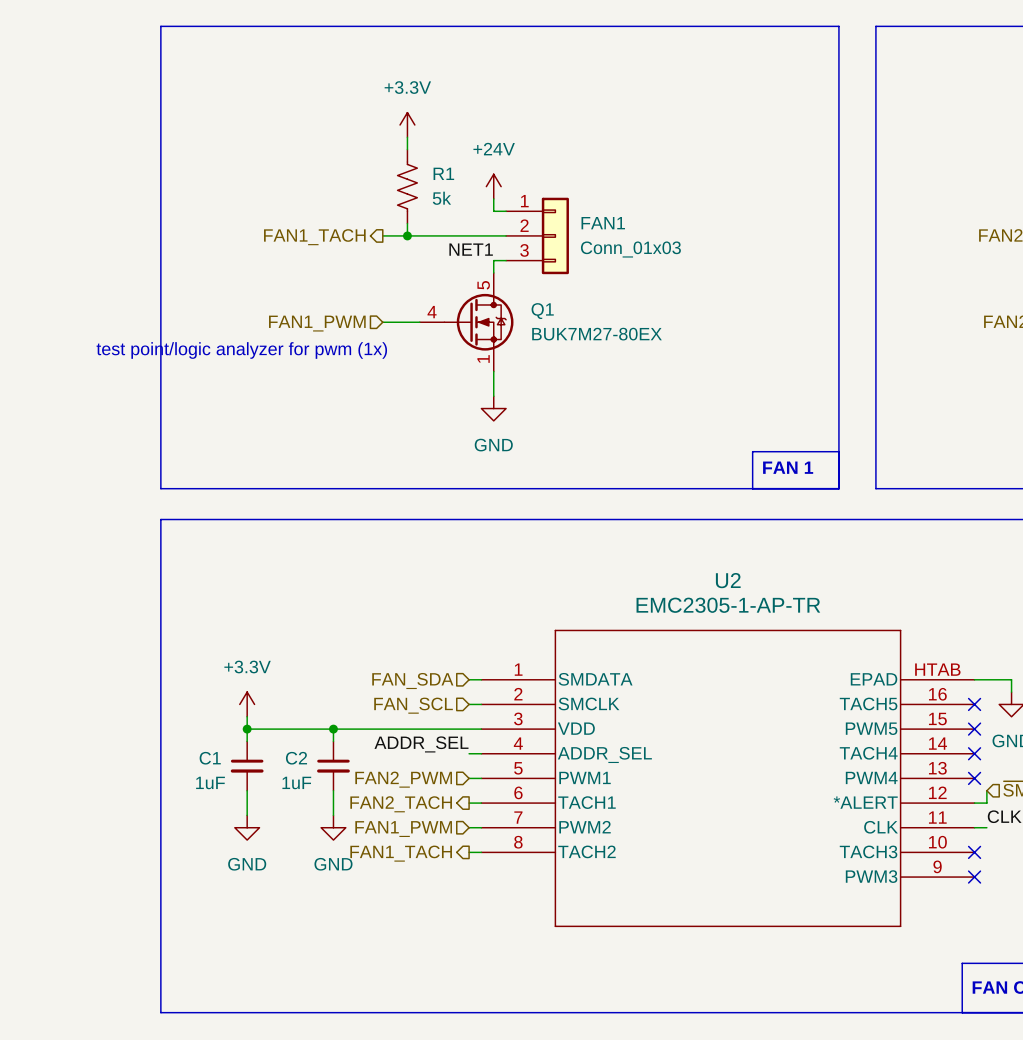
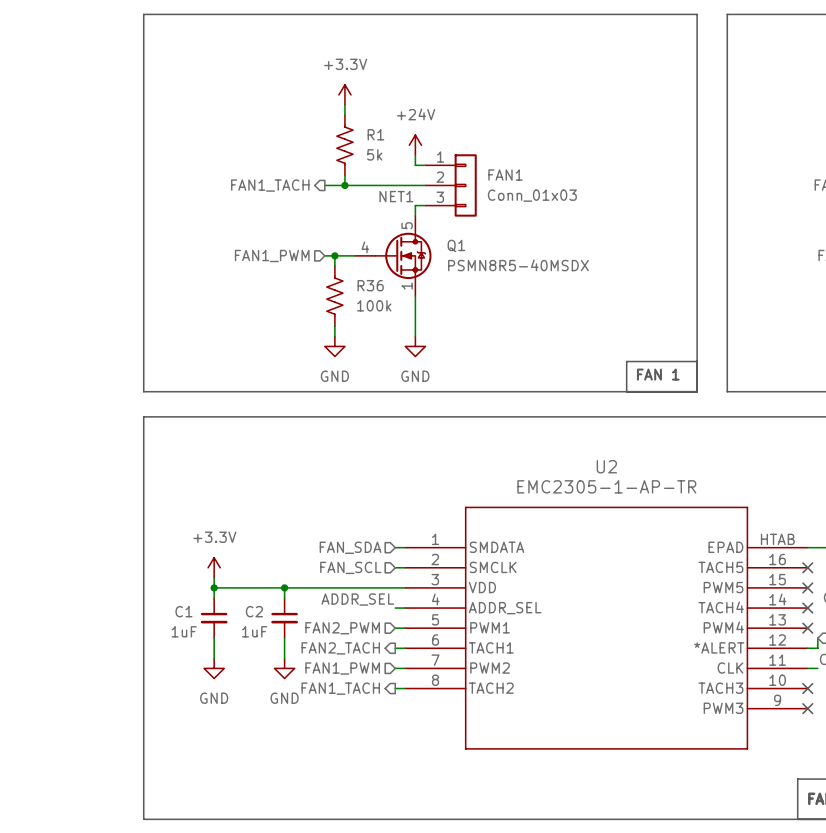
wire: none -> (334, 255) (334, 265)
junction: none -> (334, 255)
Q1 value: BUK7M27-80EX (597, 334) -> PSMN8R5-40MSDX (518, 265)
text: test point/logic analyzer for pwm (1x) (241, 350) -> none
R36: none -> 100k (334, 296)
wire: none -> (334, 326) (334, 336)
power symbol position: GND (493, 408) -> GND (415, 346)
power symbol: none -> GND (334, 346)

